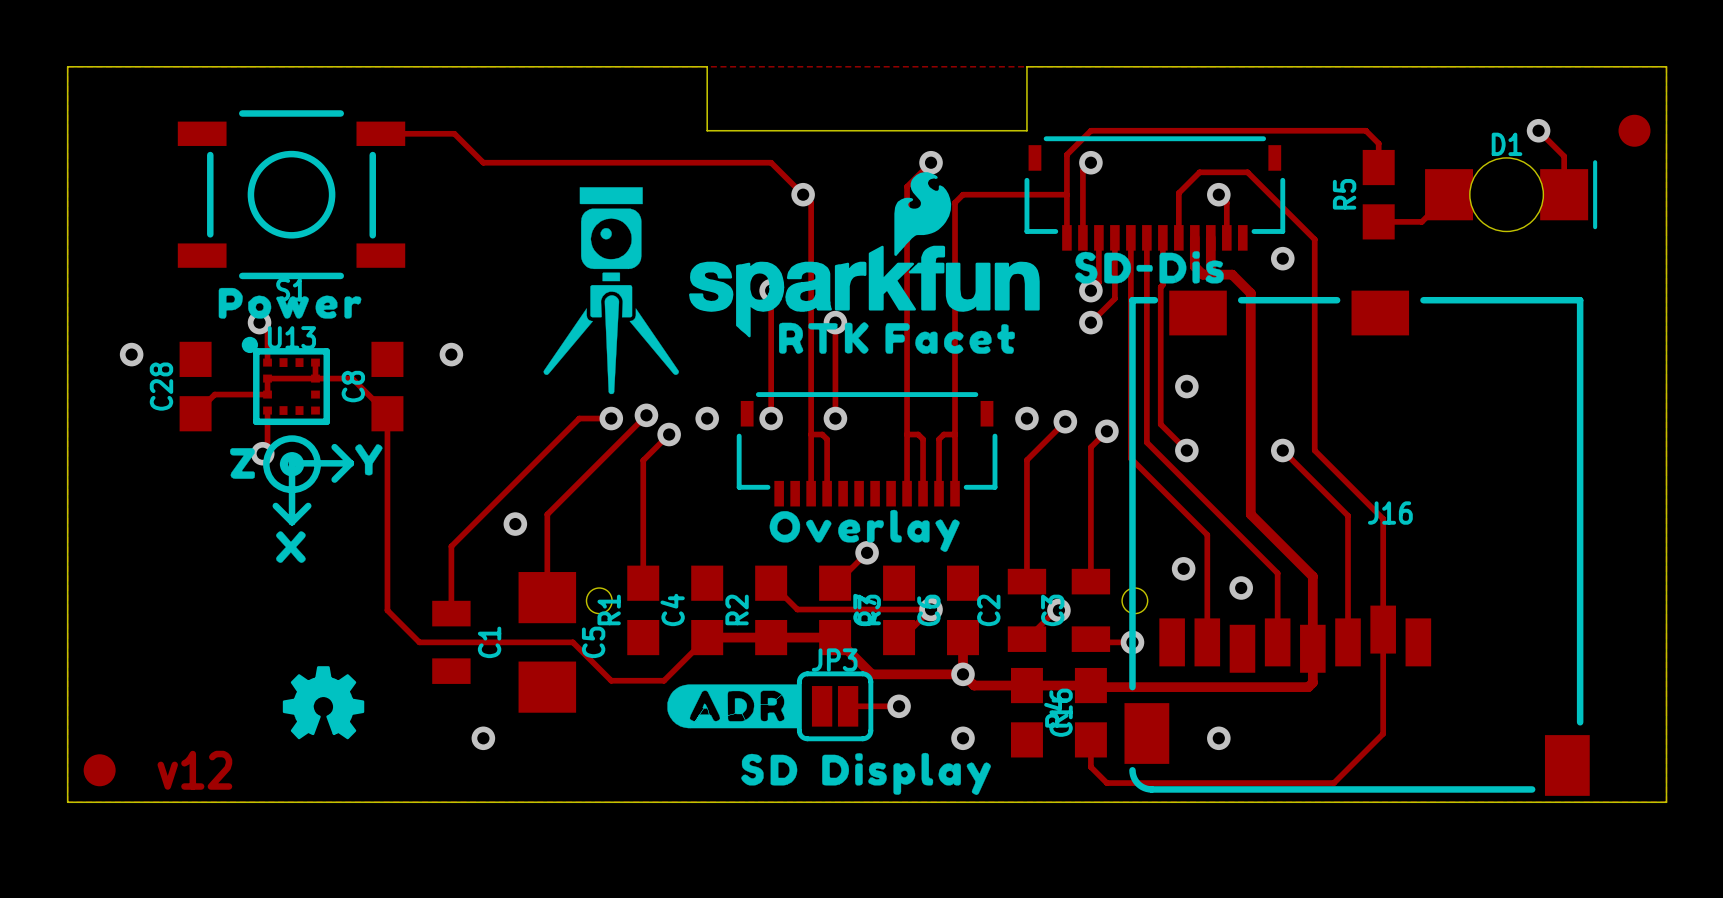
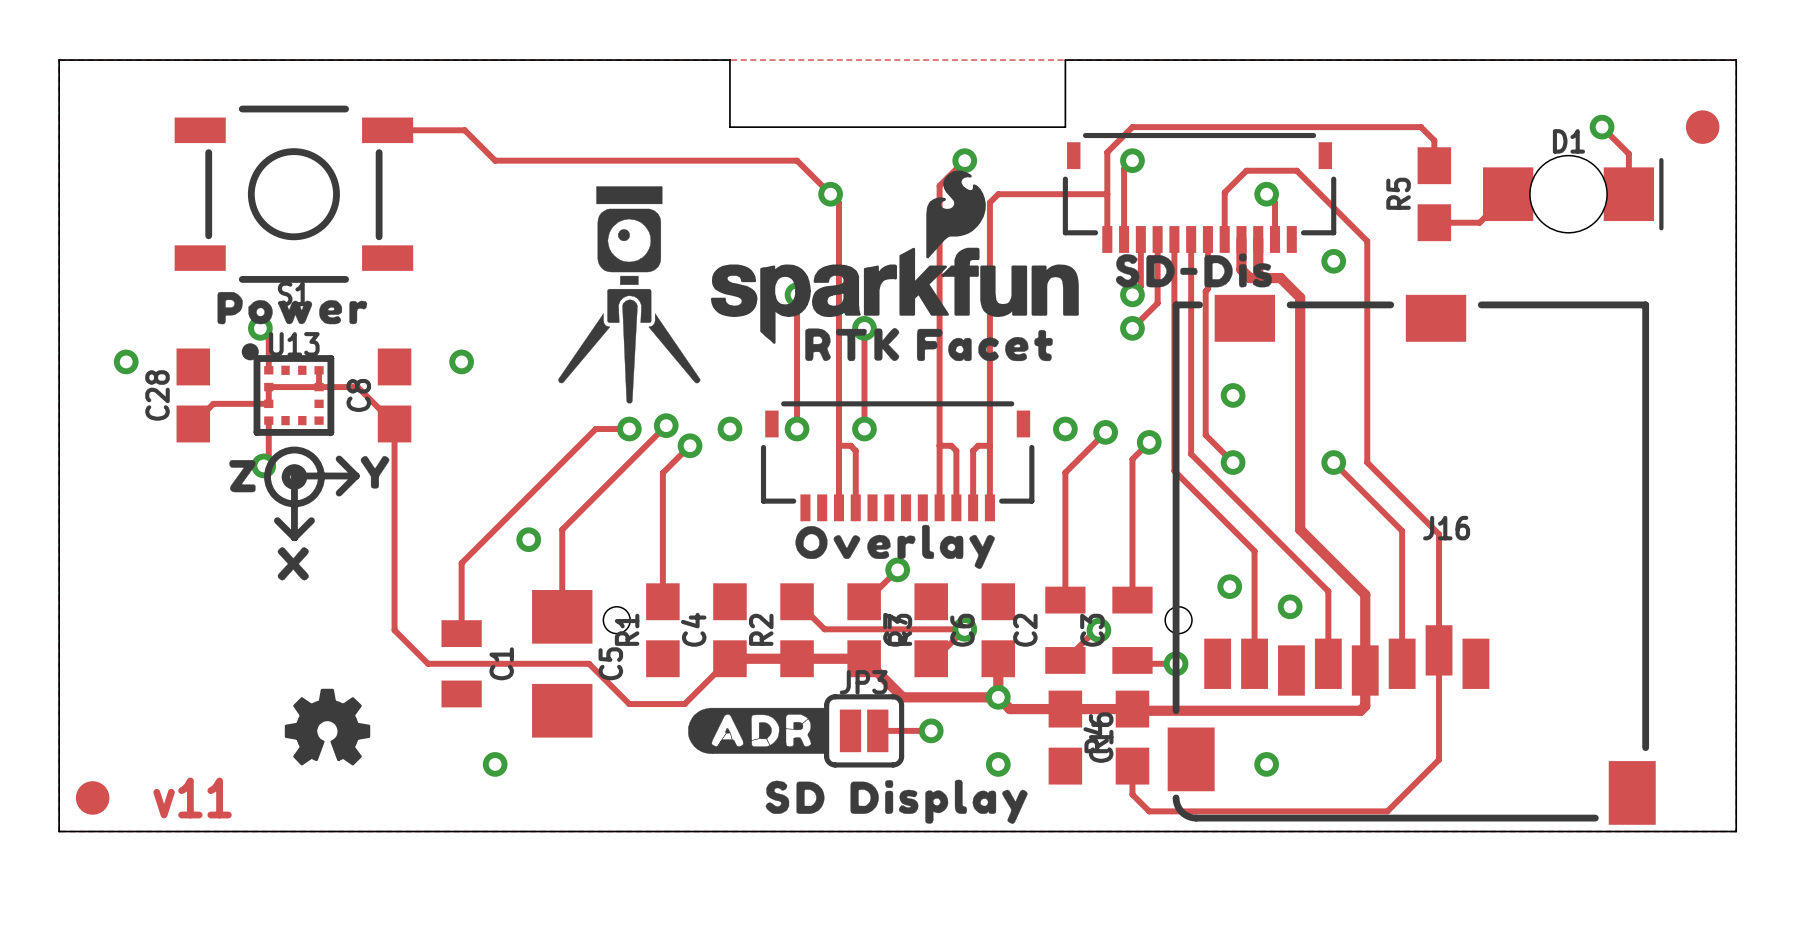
text: v12 (194, 770) -> v11 (192, 797)

